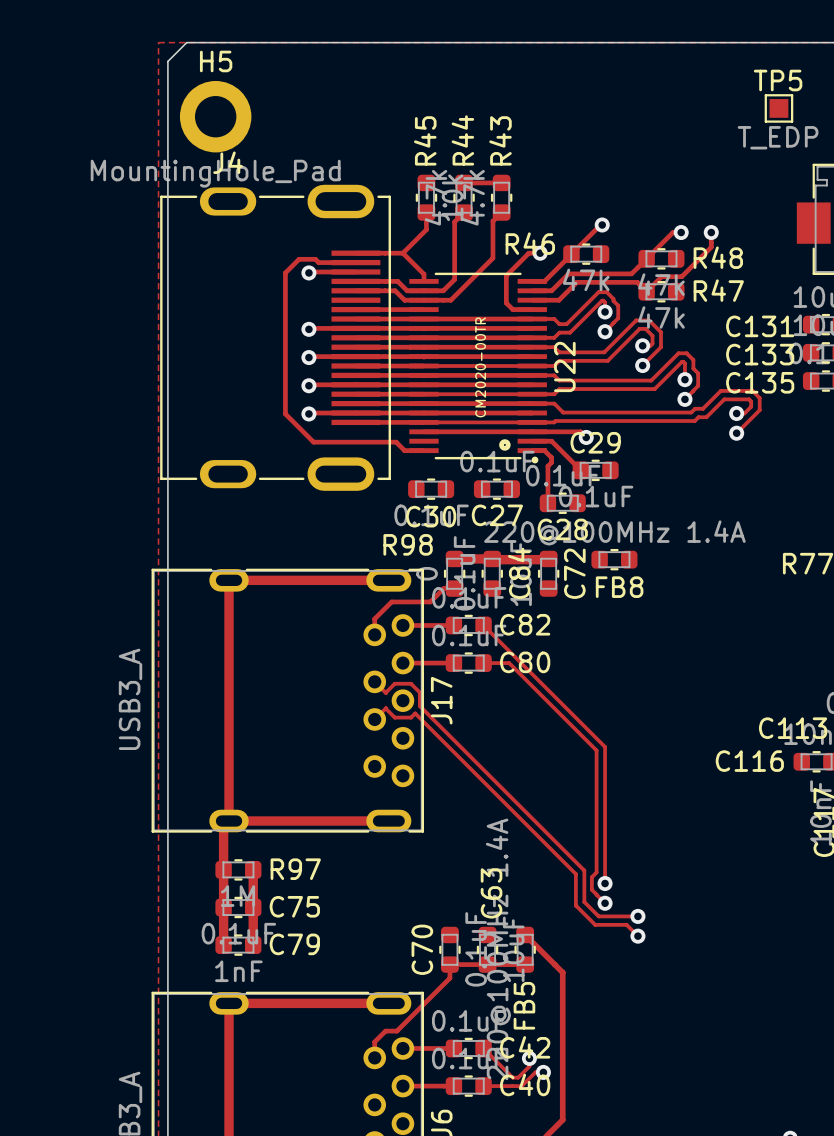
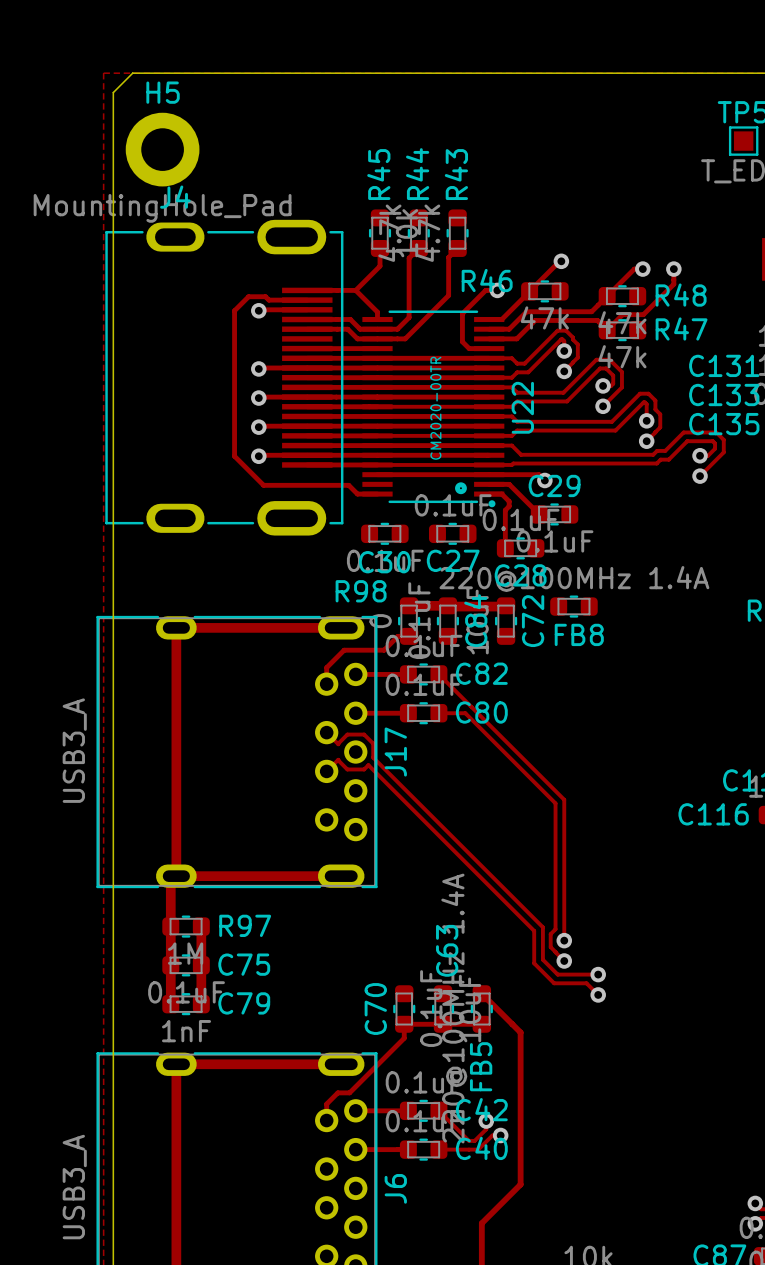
track: (464, 182) (501, 182) -> none

